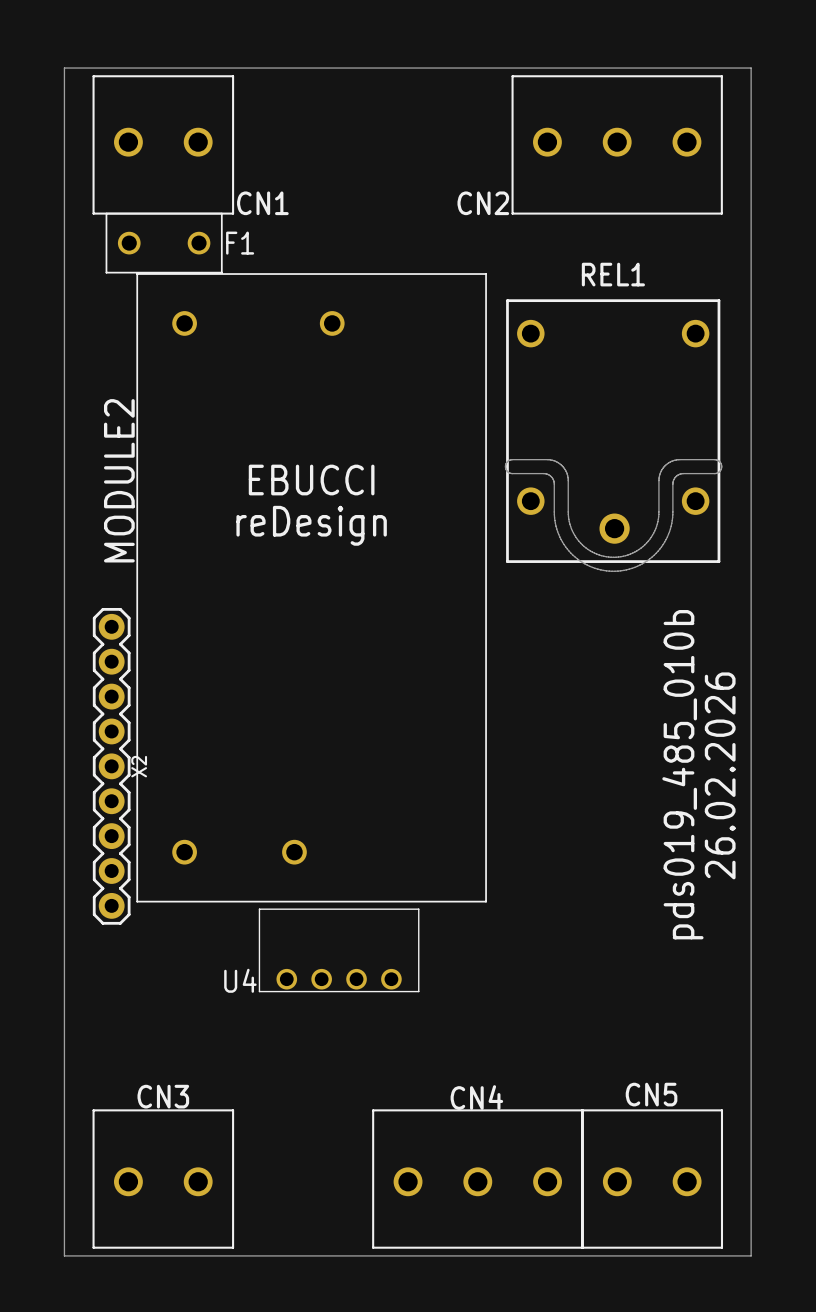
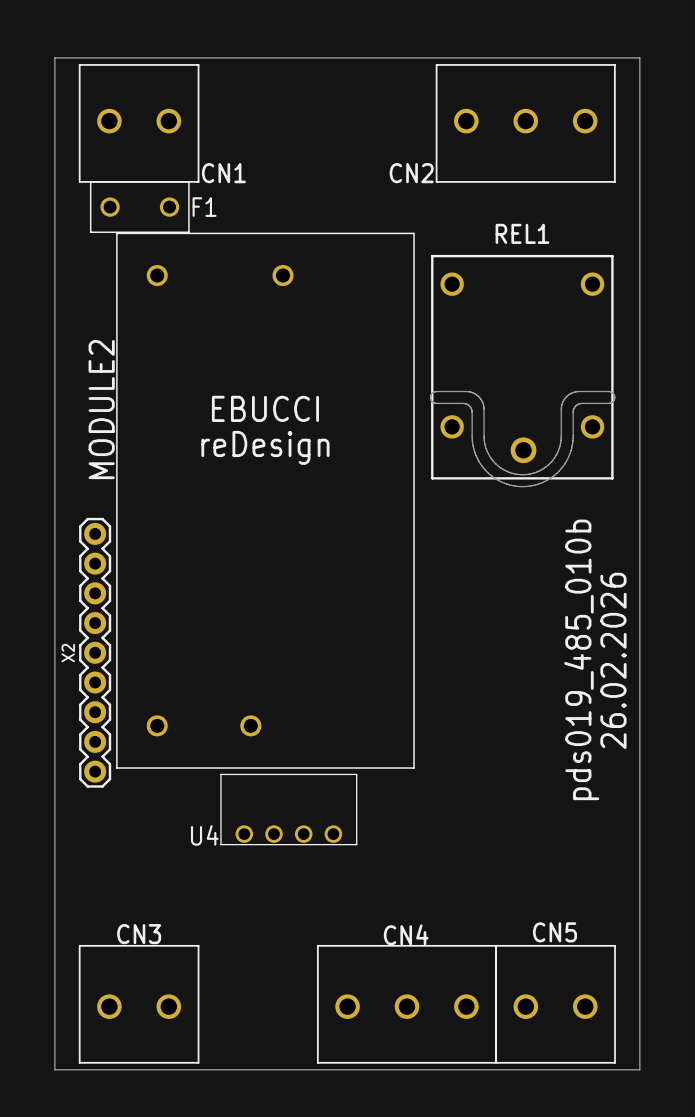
X2 name position: X2 (139, 766) -> X2 (68, 653)

